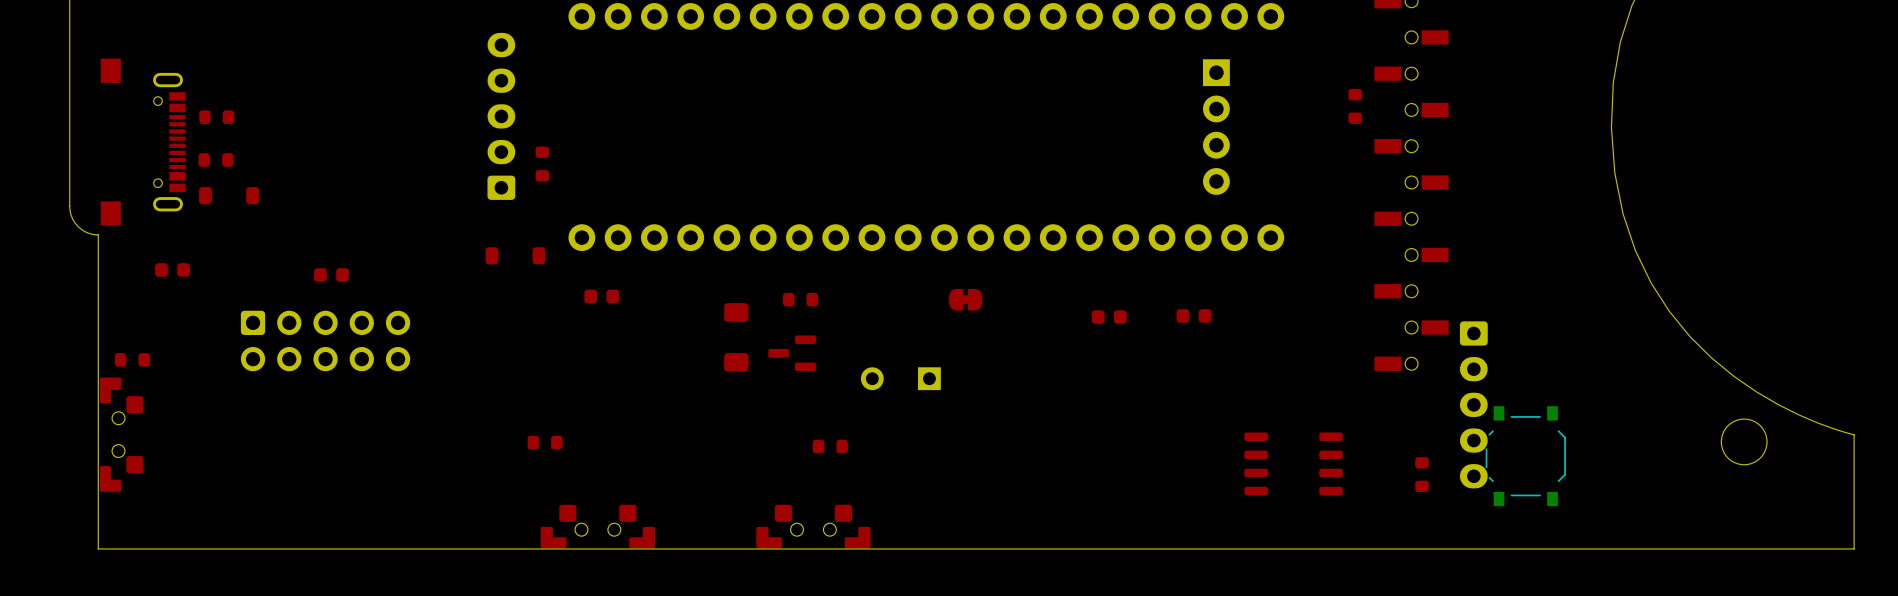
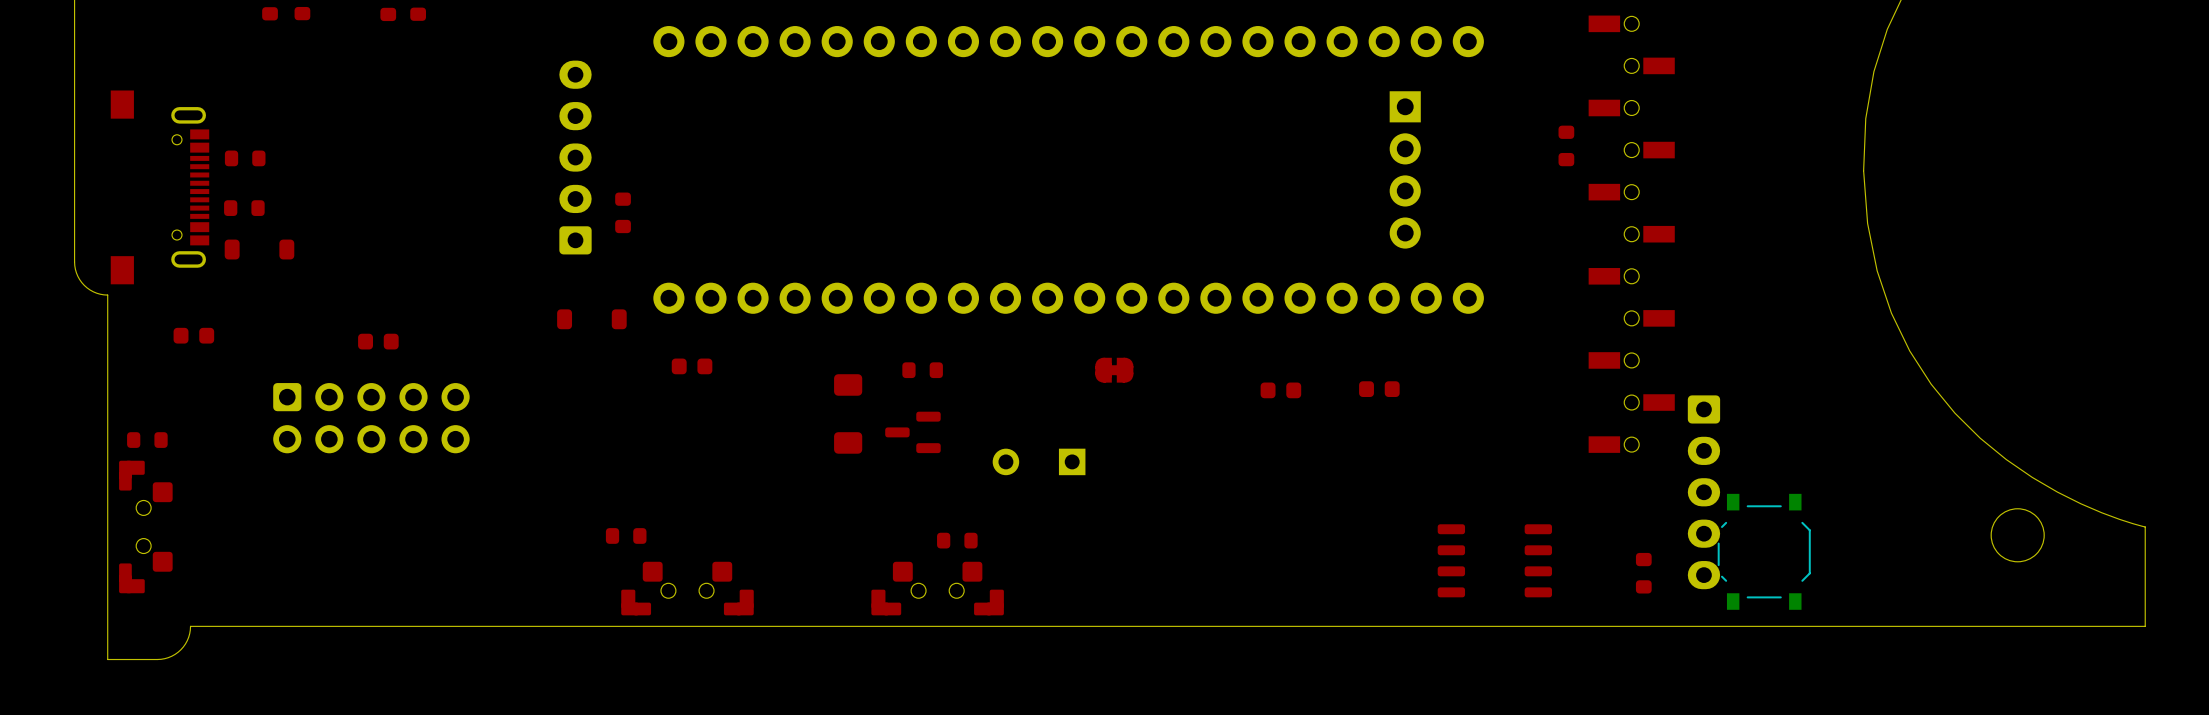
part footprint: [99, 377, 144, 492] -> [119, 460, 173, 594]
part: none -> (687, 588)
part: none -> (937, 588)
board edge: (1854, 520) (1854, 548) (141, 548) -> (2145, 626) (190, 626) (188, 637) (180, 649) (168, 657) (157, 659)
part: (597, 526) -> none
part: (813, 526) -> none

